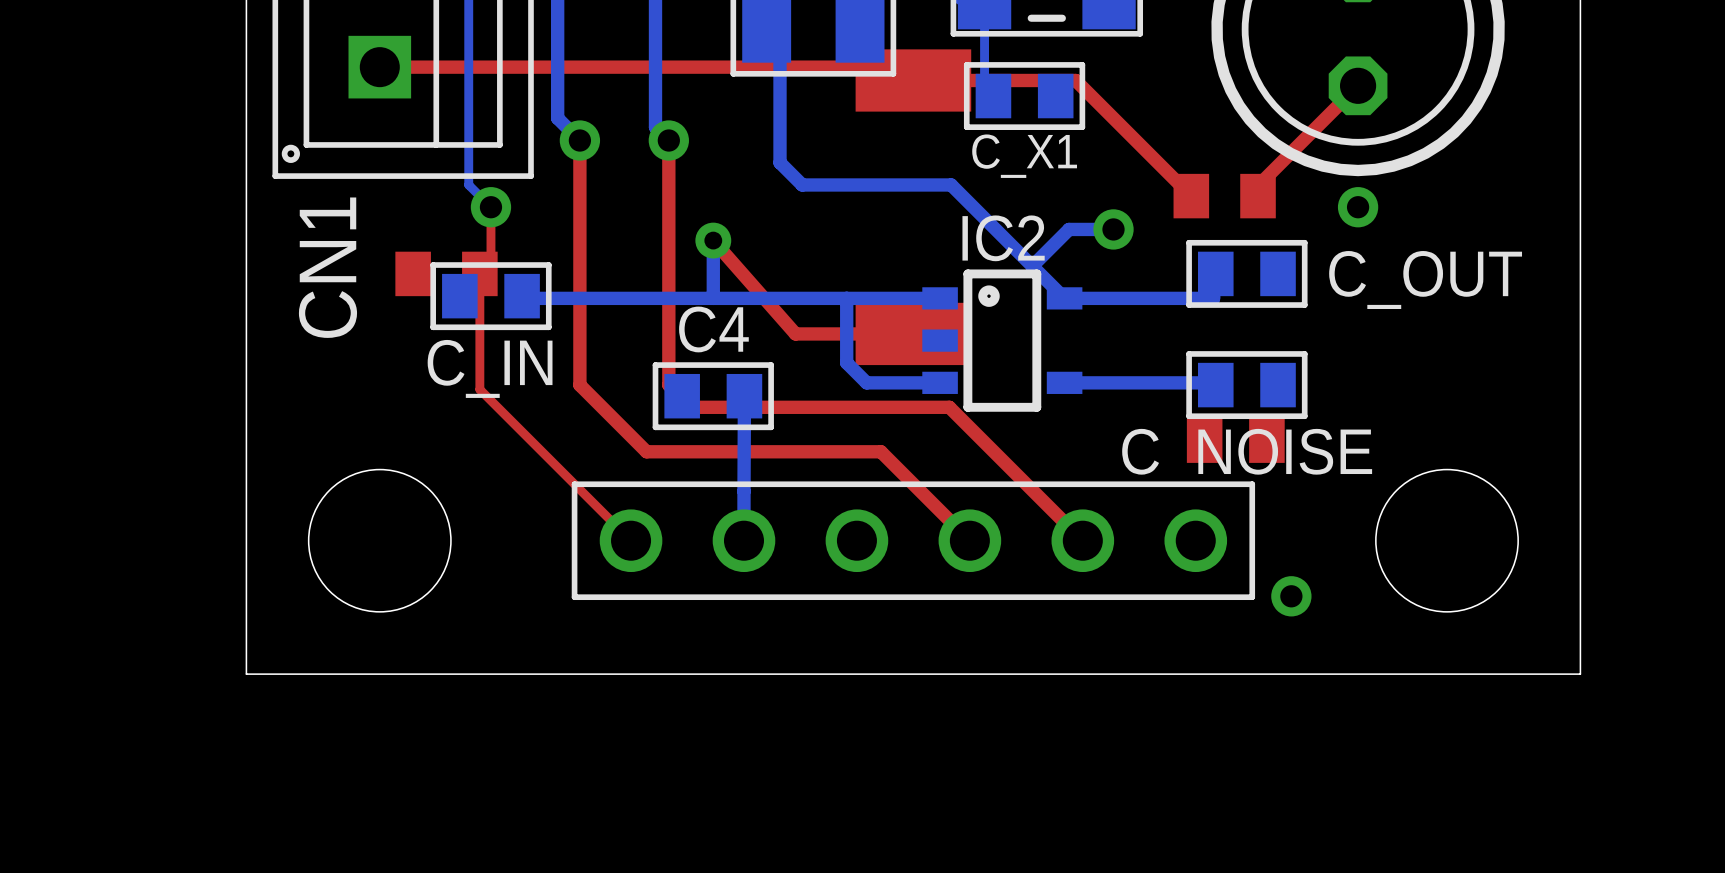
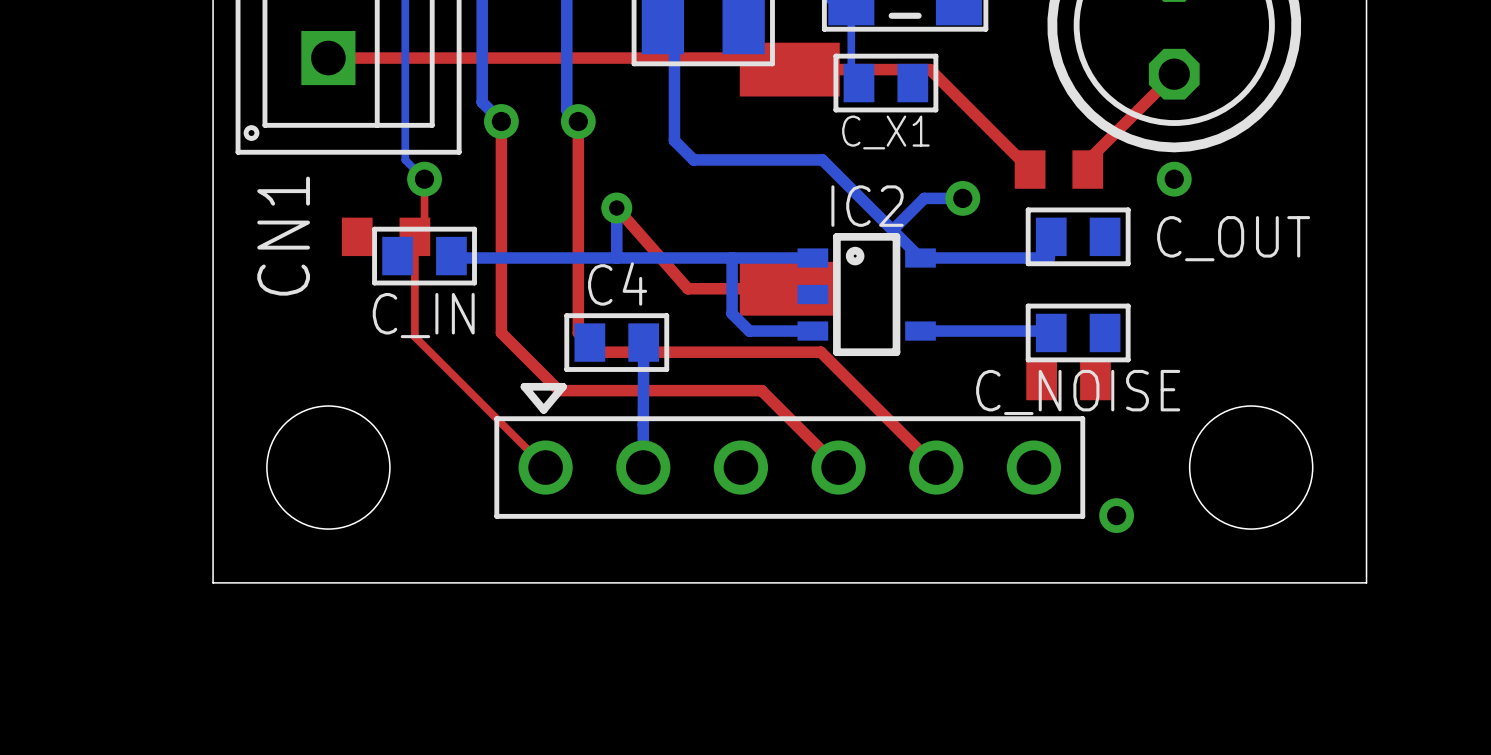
line: none -> (562, 386) (524, 386) (543, 409) (562, 386)

